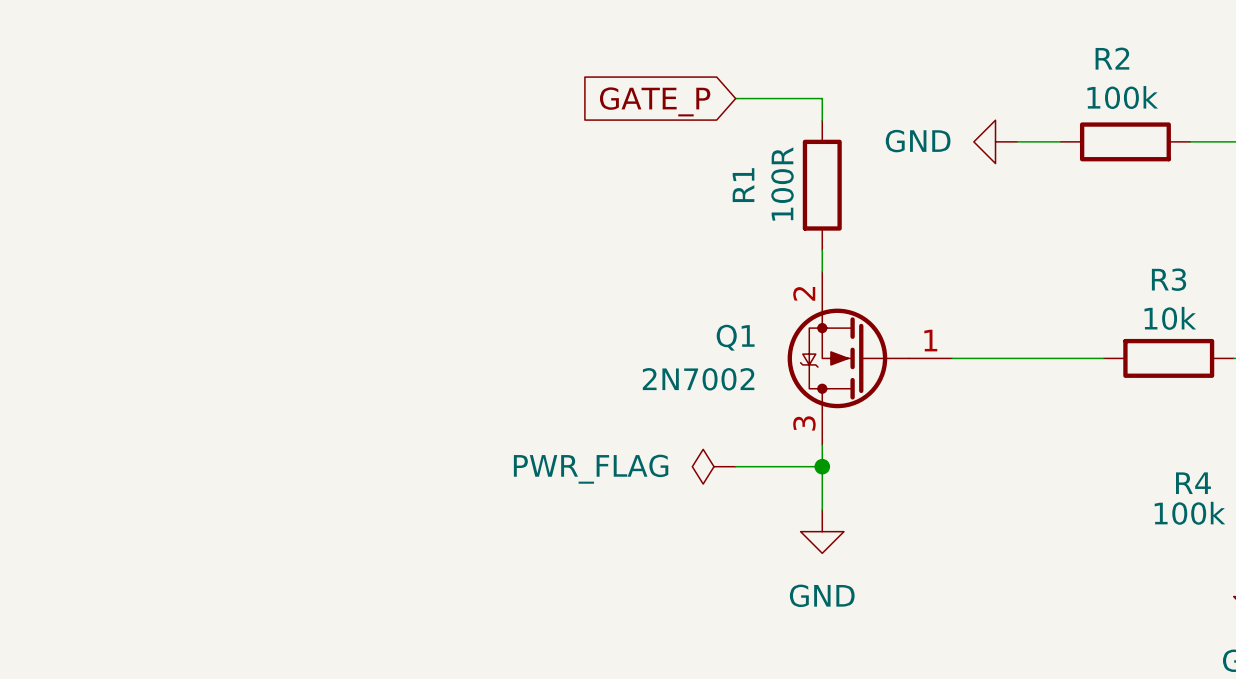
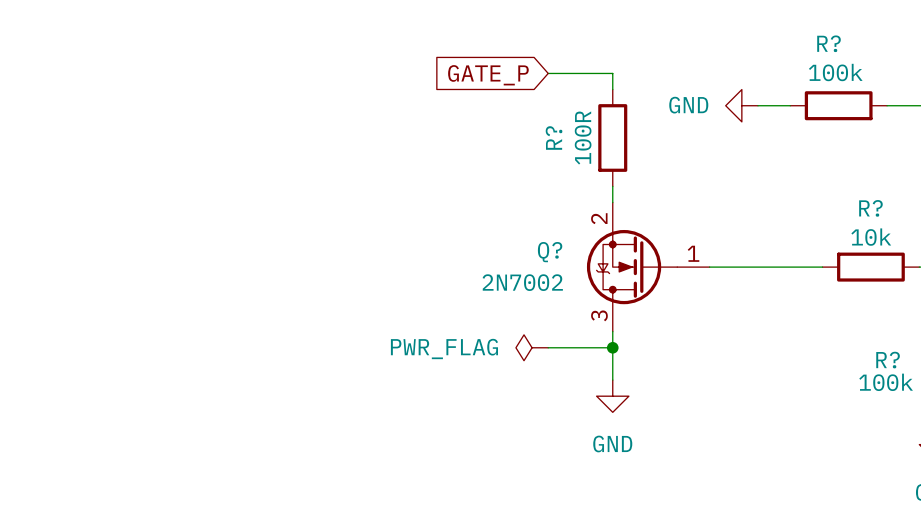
R2 name: R2 (1112, 58) -> R? (828, 43)
R1 name: R1 (743, 185) -> R? (554, 138)
R3 name: R3 (1169, 279) -> R? (870, 208)
Q1 name: Q1 (735, 337) -> Q? (550, 252)
R4 name: R4 (1193, 483) -> R? (888, 360)

